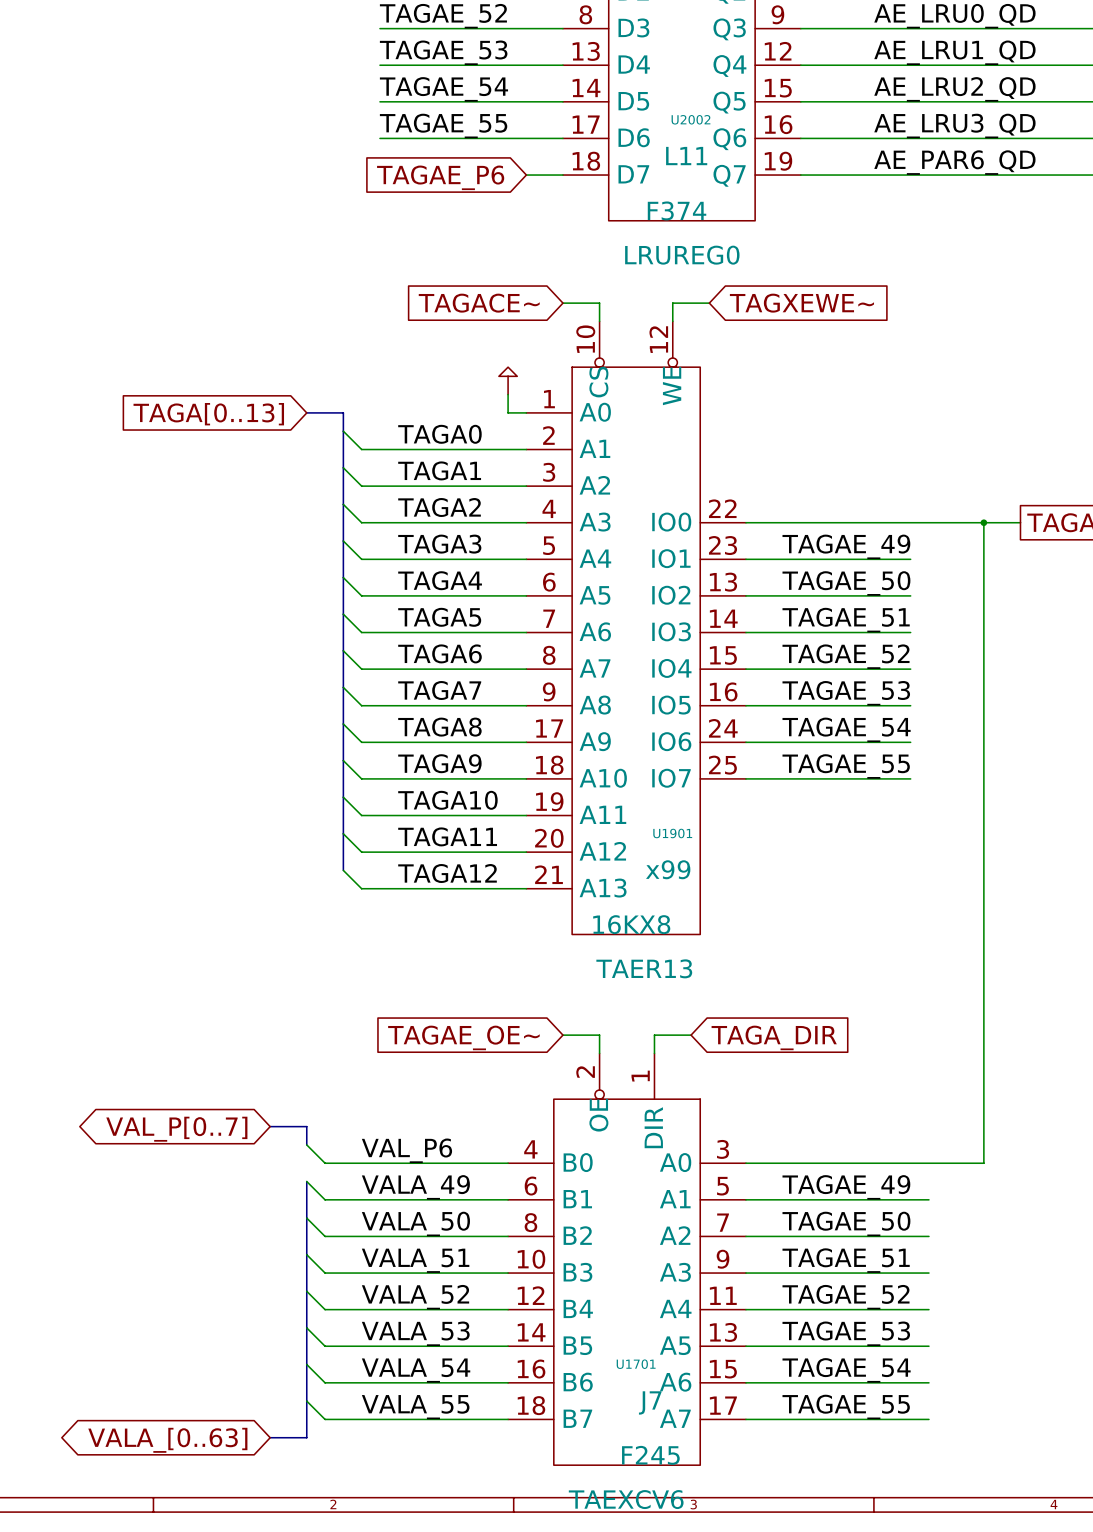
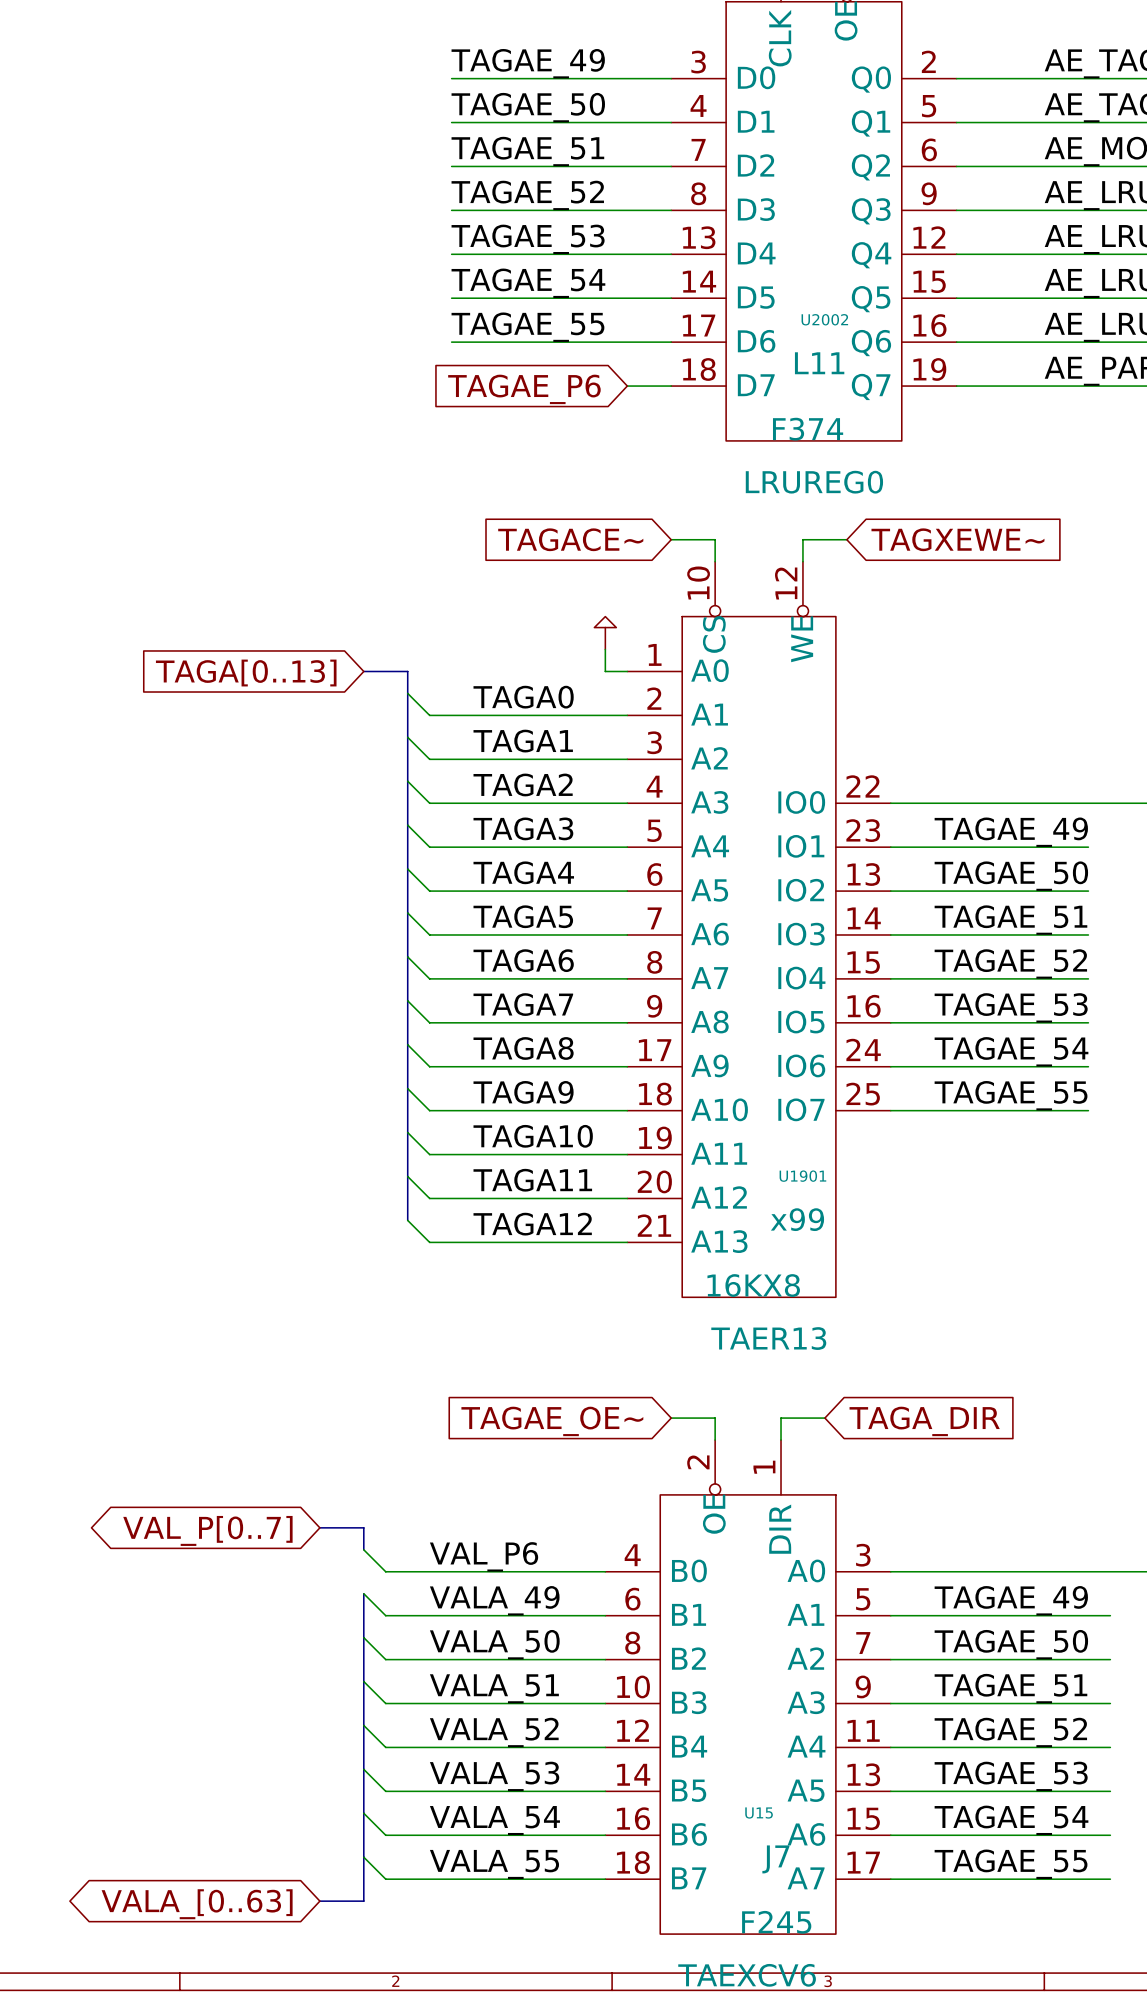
U1701 name: U1701 (636, 1364) -> U15 (759, 1813)

